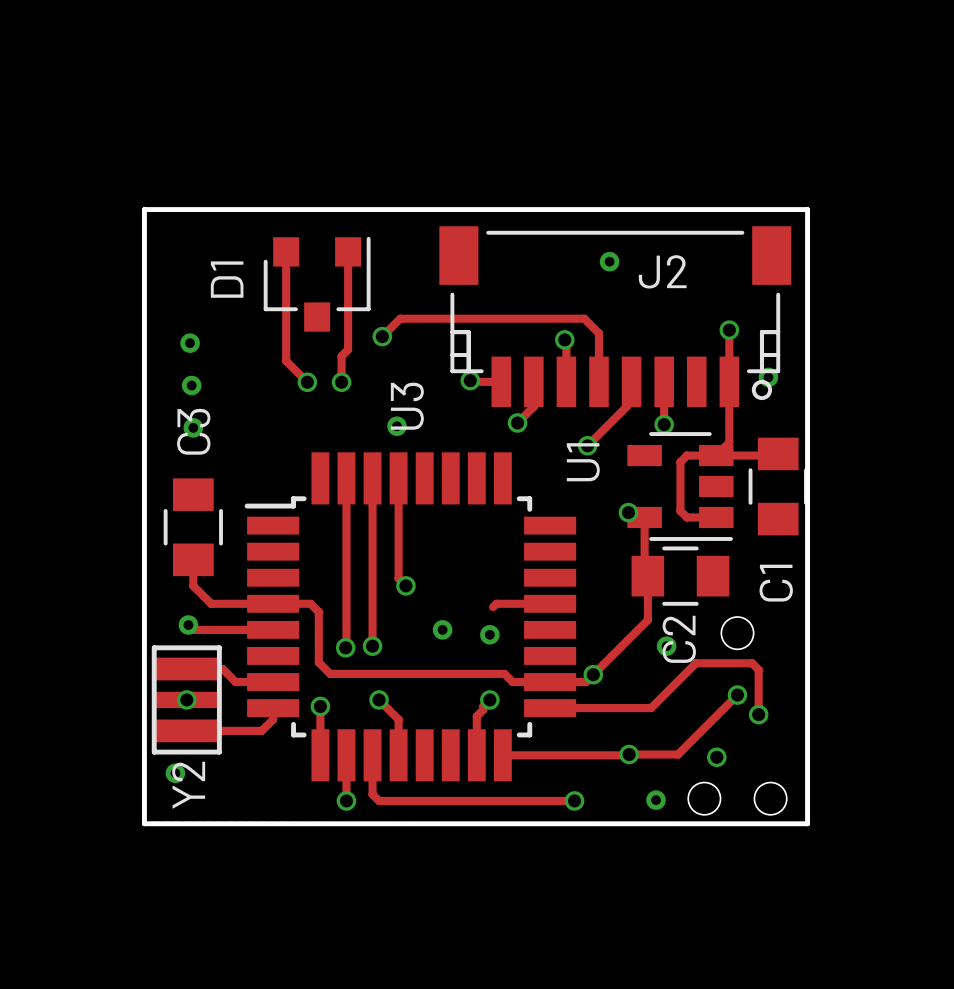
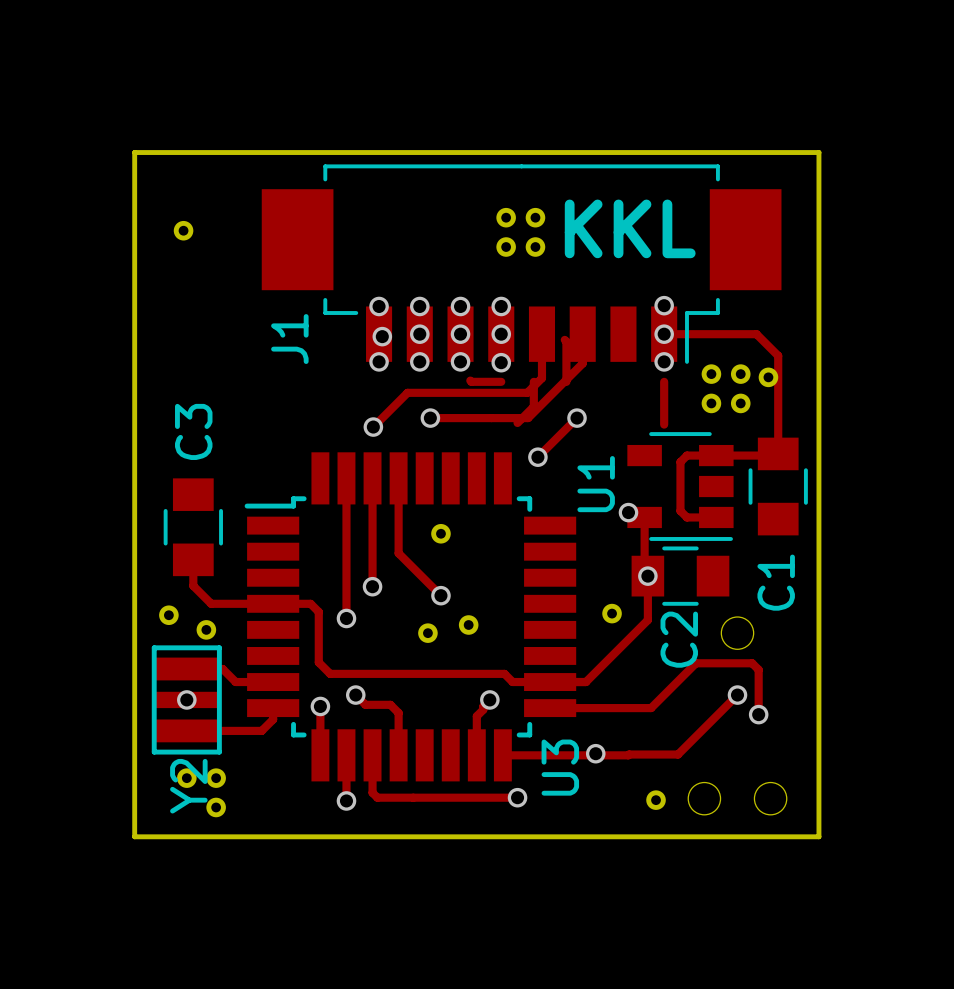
board edge: (144, 209) (807, 209) (807, 823) (144, 823) (144, 209) -> (134, 152) (134, 836) (818, 836) (818, 152) (134, 152)
part: none -> (506, 217)
part: none -> (535, 217)
text: none -> KKL (630, 228)
part: none -> (183, 230)
part: none -> (506, 247)
part: none -> (535, 247)
track: (286, 251) (286, 361) (307, 382) -> none
track: (348, 251) (348, 349) (341, 356) (341, 382) -> none
part: (609, 261) -> none
J1: none -> (521, 264)
D1: (317, 284) -> none
track: none -> (664, 305) (664, 334) (756, 334) (778, 355) (778, 453)
via: none -> (664, 305)
via: none -> (379, 306)
via: none -> (419, 306)
via: none -> (460, 306)
via: none -> (501, 306)
J2: (615, 316) -> none
track: (729, 330) (729, 442) (716, 455) -> none
via: (729, 330) -> none
via: none -> (419, 334)
via: none -> (460, 334)
via: none -> (501, 334)
track: none -> (541, 334) (541, 378) (527, 392) (407, 392) (373, 427)
track: none -> (582, 334) (582, 363) (528, 418) (430, 418)
via: none -> (664, 334)
track: (382, 336) (400, 318) (584, 318) (599, 333) (599, 381) -> none
via: (564, 339) -> none
part: (190, 343) -> none
via: none -> (379, 361)
via: none -> (419, 361)
via: none -> (664, 361)
via: none -> (501, 362)
part: none -> (711, 374)
part: none -> (740, 374)
via position: (470, 380) -> (460, 361)
track: (631, 381) (631, 401) (587, 445) -> none
via: (307, 382) -> none
via: (341, 382) -> none
part: (191, 385) -> none
part: none -> (711, 403)
part: none -> (740, 403)
U3 name position: U3 (407, 406) -> U3 (560, 767)
via: none -> (430, 418)
track: none -> (577, 418) (537, 457)
via: none -> (577, 418)
via: (517, 422) -> none
via: (664, 424) -> none
part: (396, 426) -> none
part: (193, 427) -> none
via: none -> (373, 427)
via: (587, 445) -> none
via: none -> (537, 457)
U1 name position: U1 (583, 462) -> U1 (596, 484)
part: none -> (440, 533)
track: (398, 553) (398, 578) (405, 585) -> (398, 553) (440, 595)
via: none -> (647, 576)
via: (405, 585) -> none
track: (372, 586) (372, 646) -> none
via: none -> (372, 586)
via: none -> (440, 595)
track: (550, 603) (496, 603) (493, 607) -> none
part: none -> (612, 613)
part: none -> (168, 615)
track: (346, 618) (345, 647) -> none
via: none -> (346, 618)
track: (188, 625) (193, 629) (273, 629) -> none
part: (188, 625) -> none
part: none -> (468, 625)
part: none -> (206, 629)
part: (442, 629) -> none
part: none -> (427, 633)
part: (489, 634) -> none
via: (372, 646) -> none
part: (666, 646) -> none
via: (345, 647) -> none
via: (593, 674) -> none
track: (379, 699) (398, 719) -> (355, 695) (365, 704) (390, 704) (398, 712) (398, 719)
via position: (379, 699) -> (355, 695)
via: none -> (595, 753)
via: (629, 754) -> none
via: (716, 757) -> none
part position: (175, 773) -> (186, 778)
part: none -> (216, 778)
track: (372, 792) (379, 800) (574, 800) -> (372, 792) (377, 797) (517, 797)
via: none -> (517, 797)
via: (574, 800) -> none
part: none -> (216, 807)

